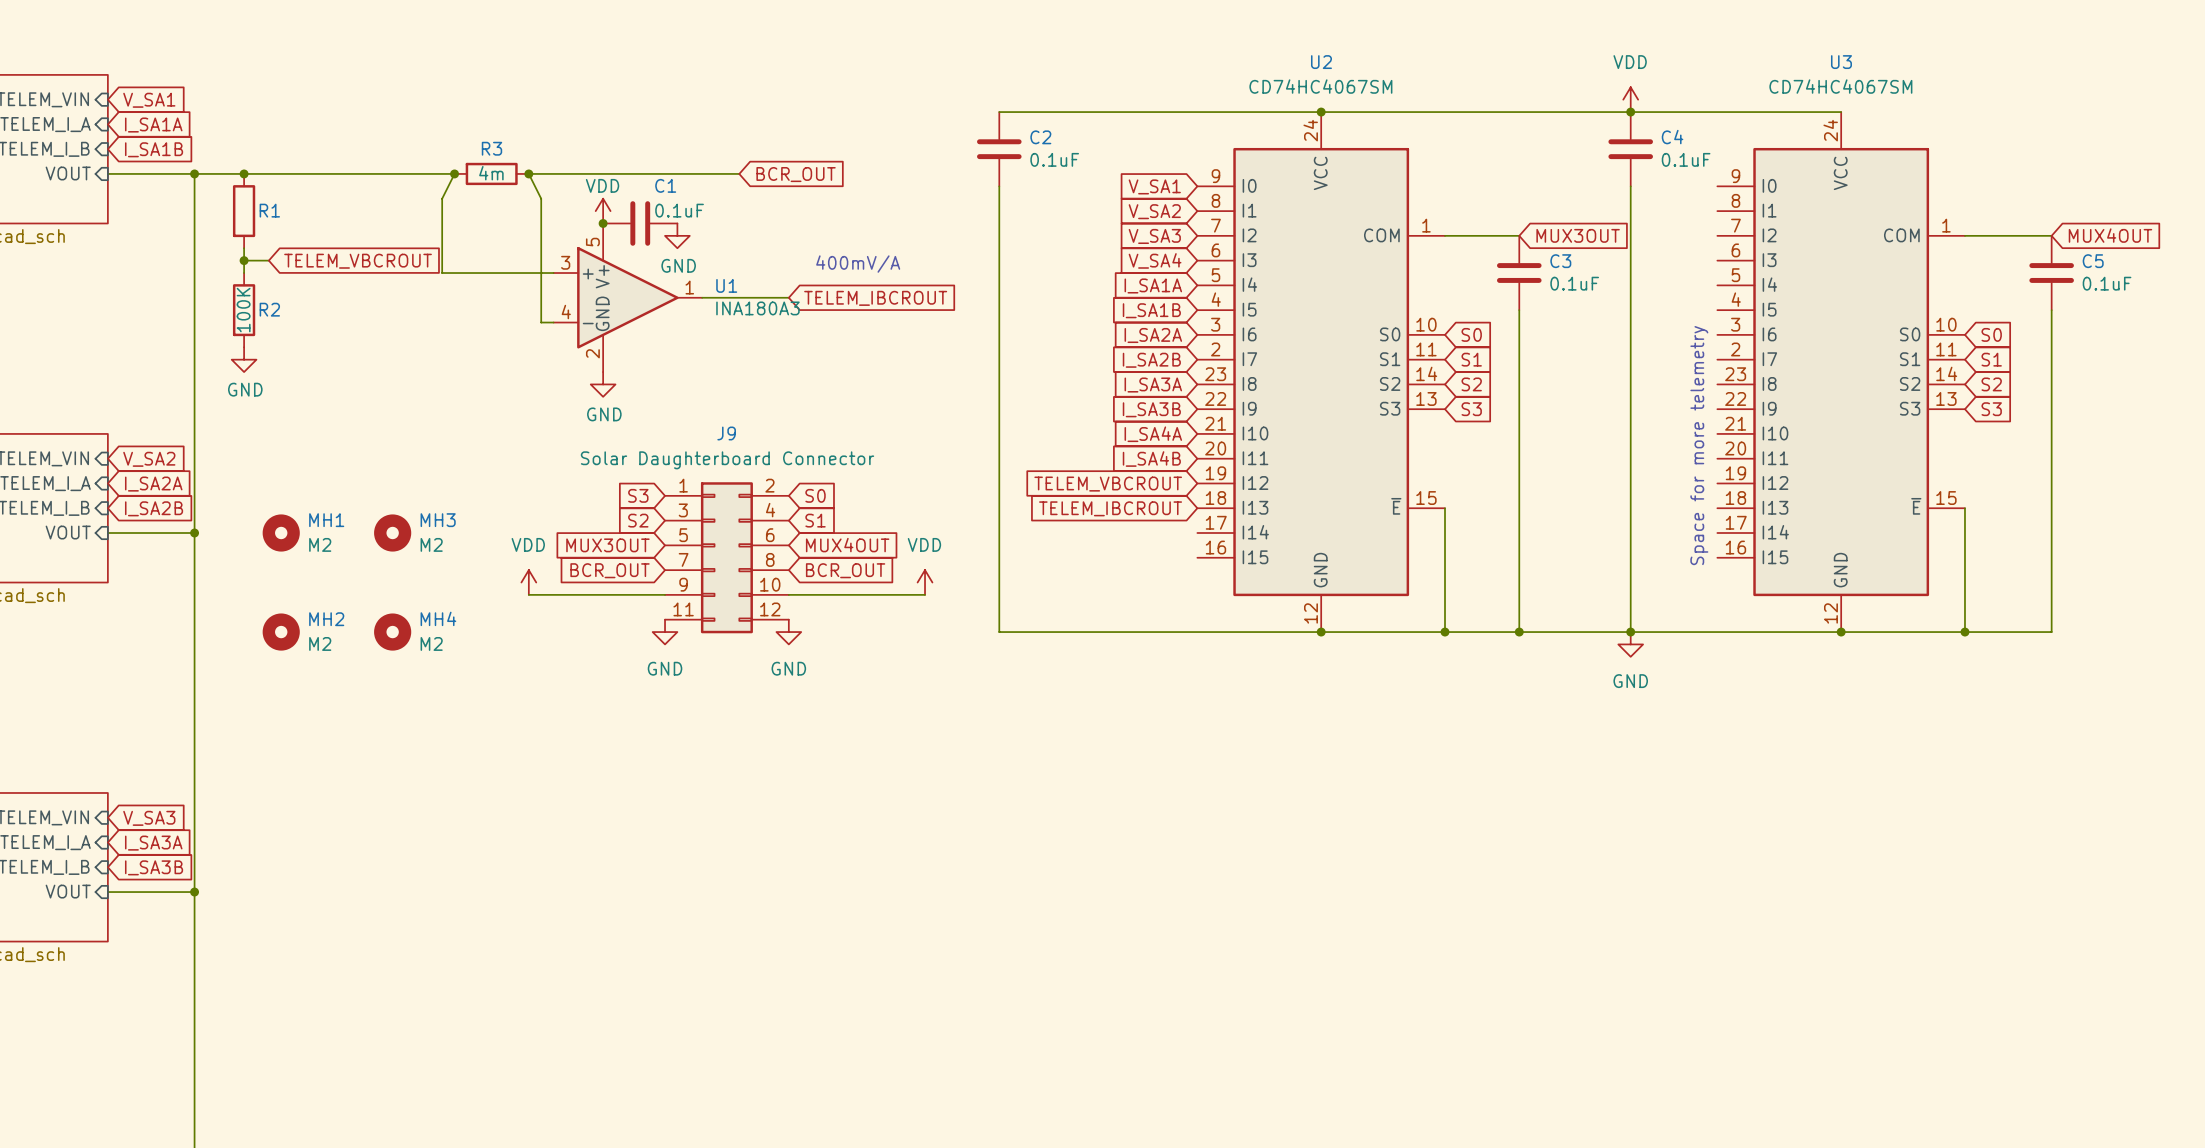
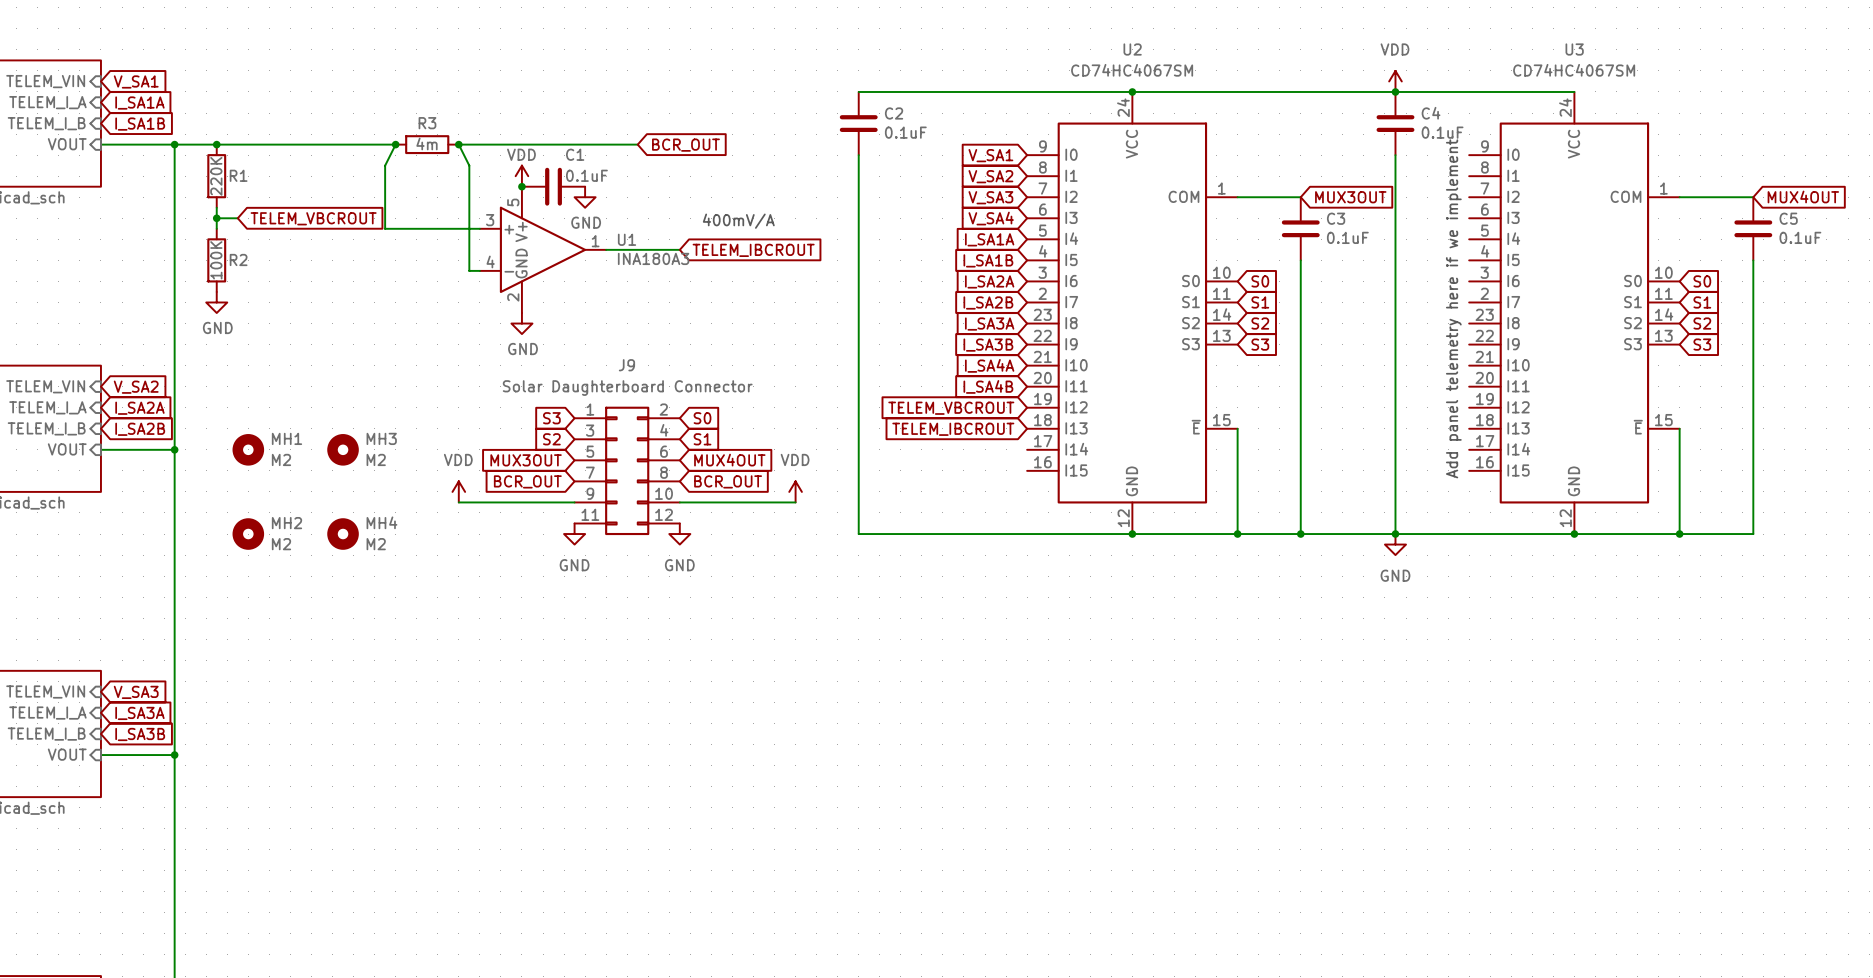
R1 value: none -> 220K (216, 176)
text: Space for more telemetry (1699, 445) -> Add panel telemetry here if we implement (1453, 308)

